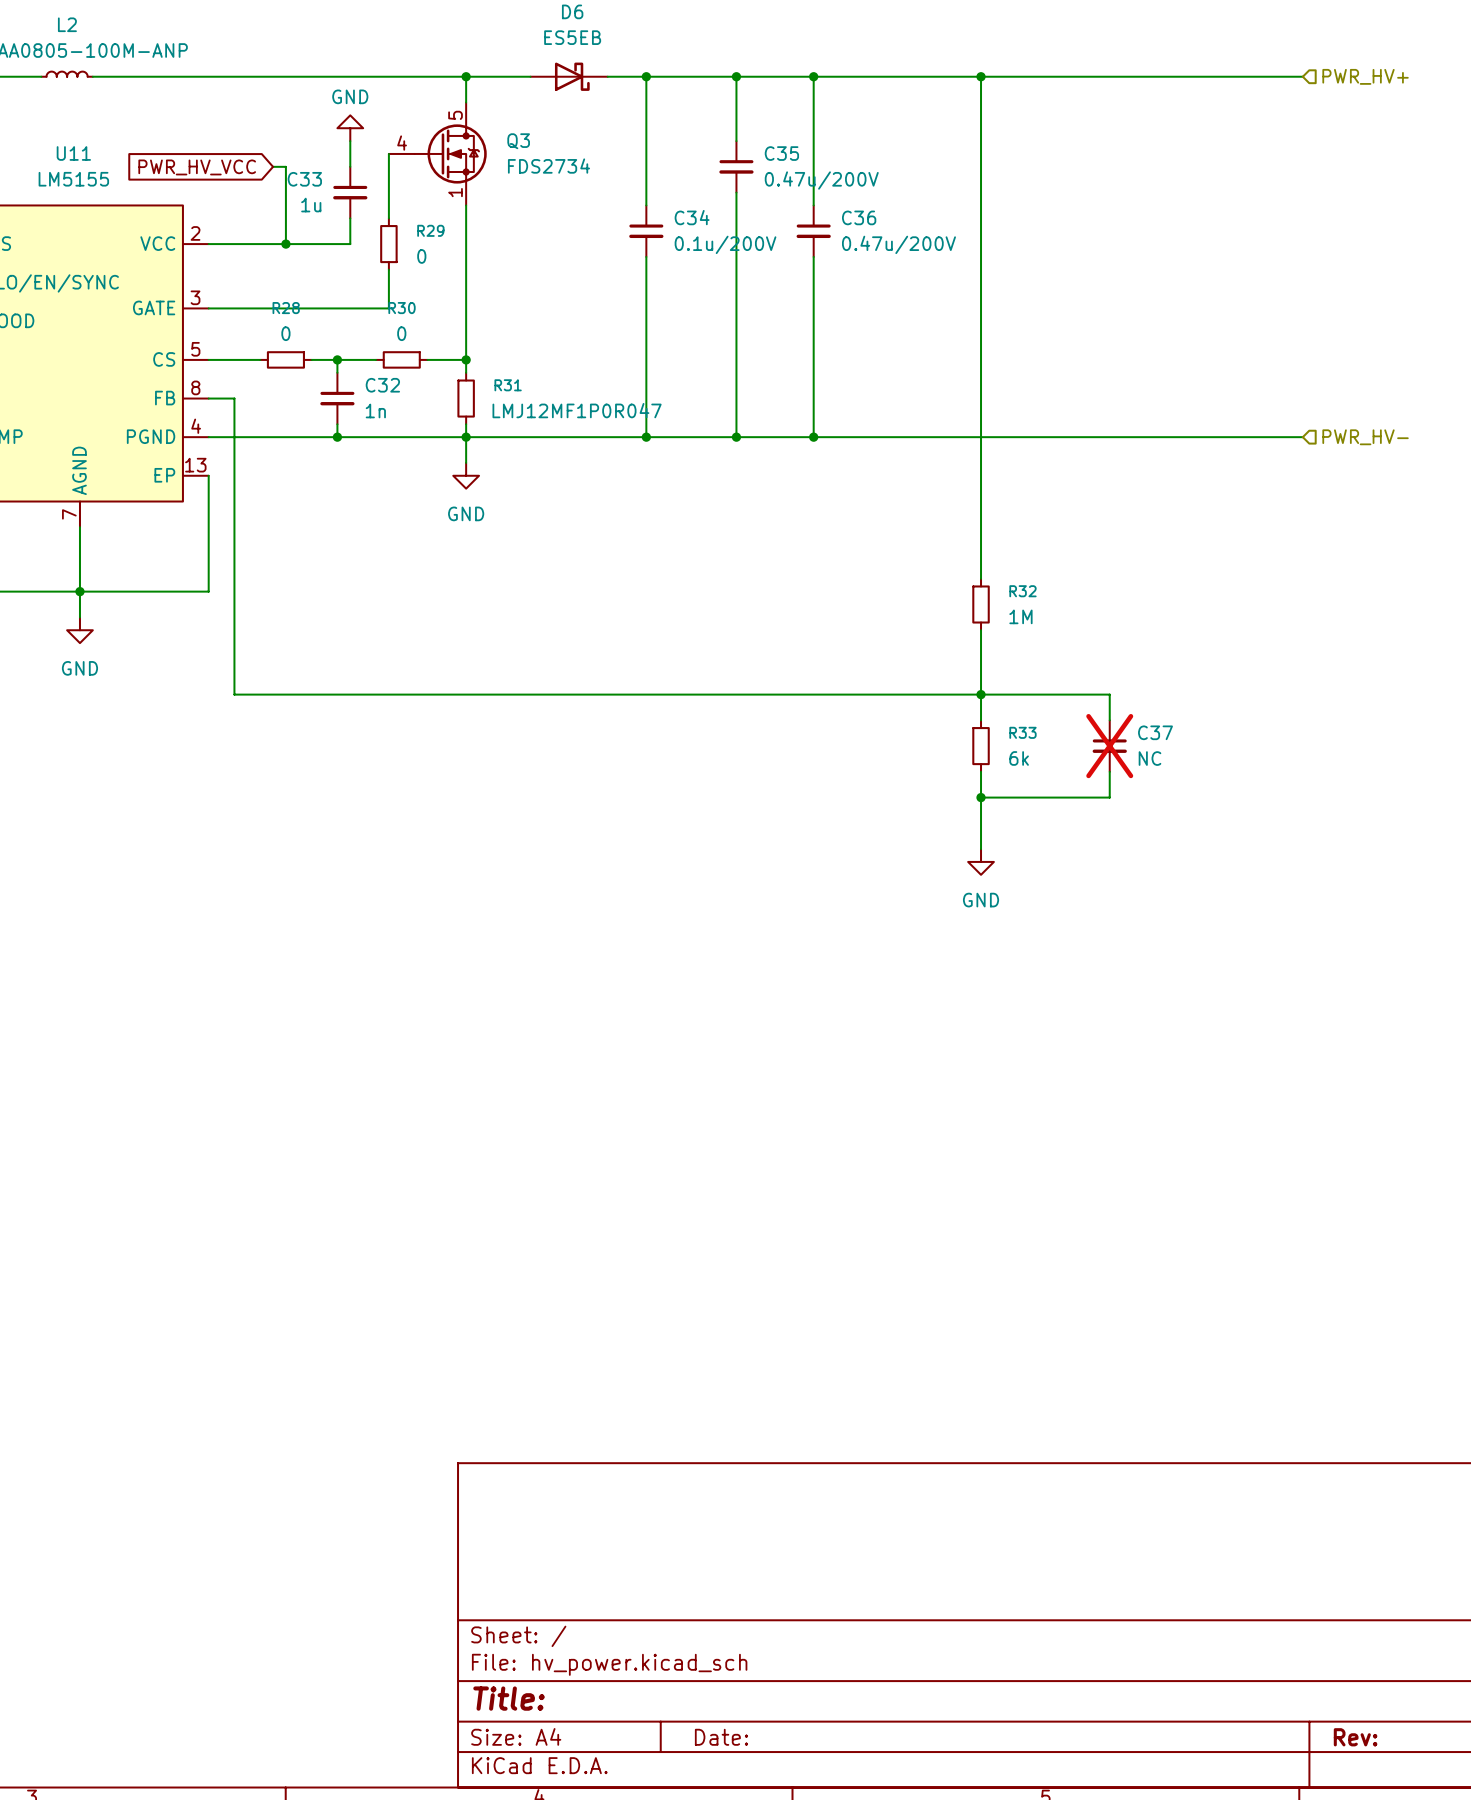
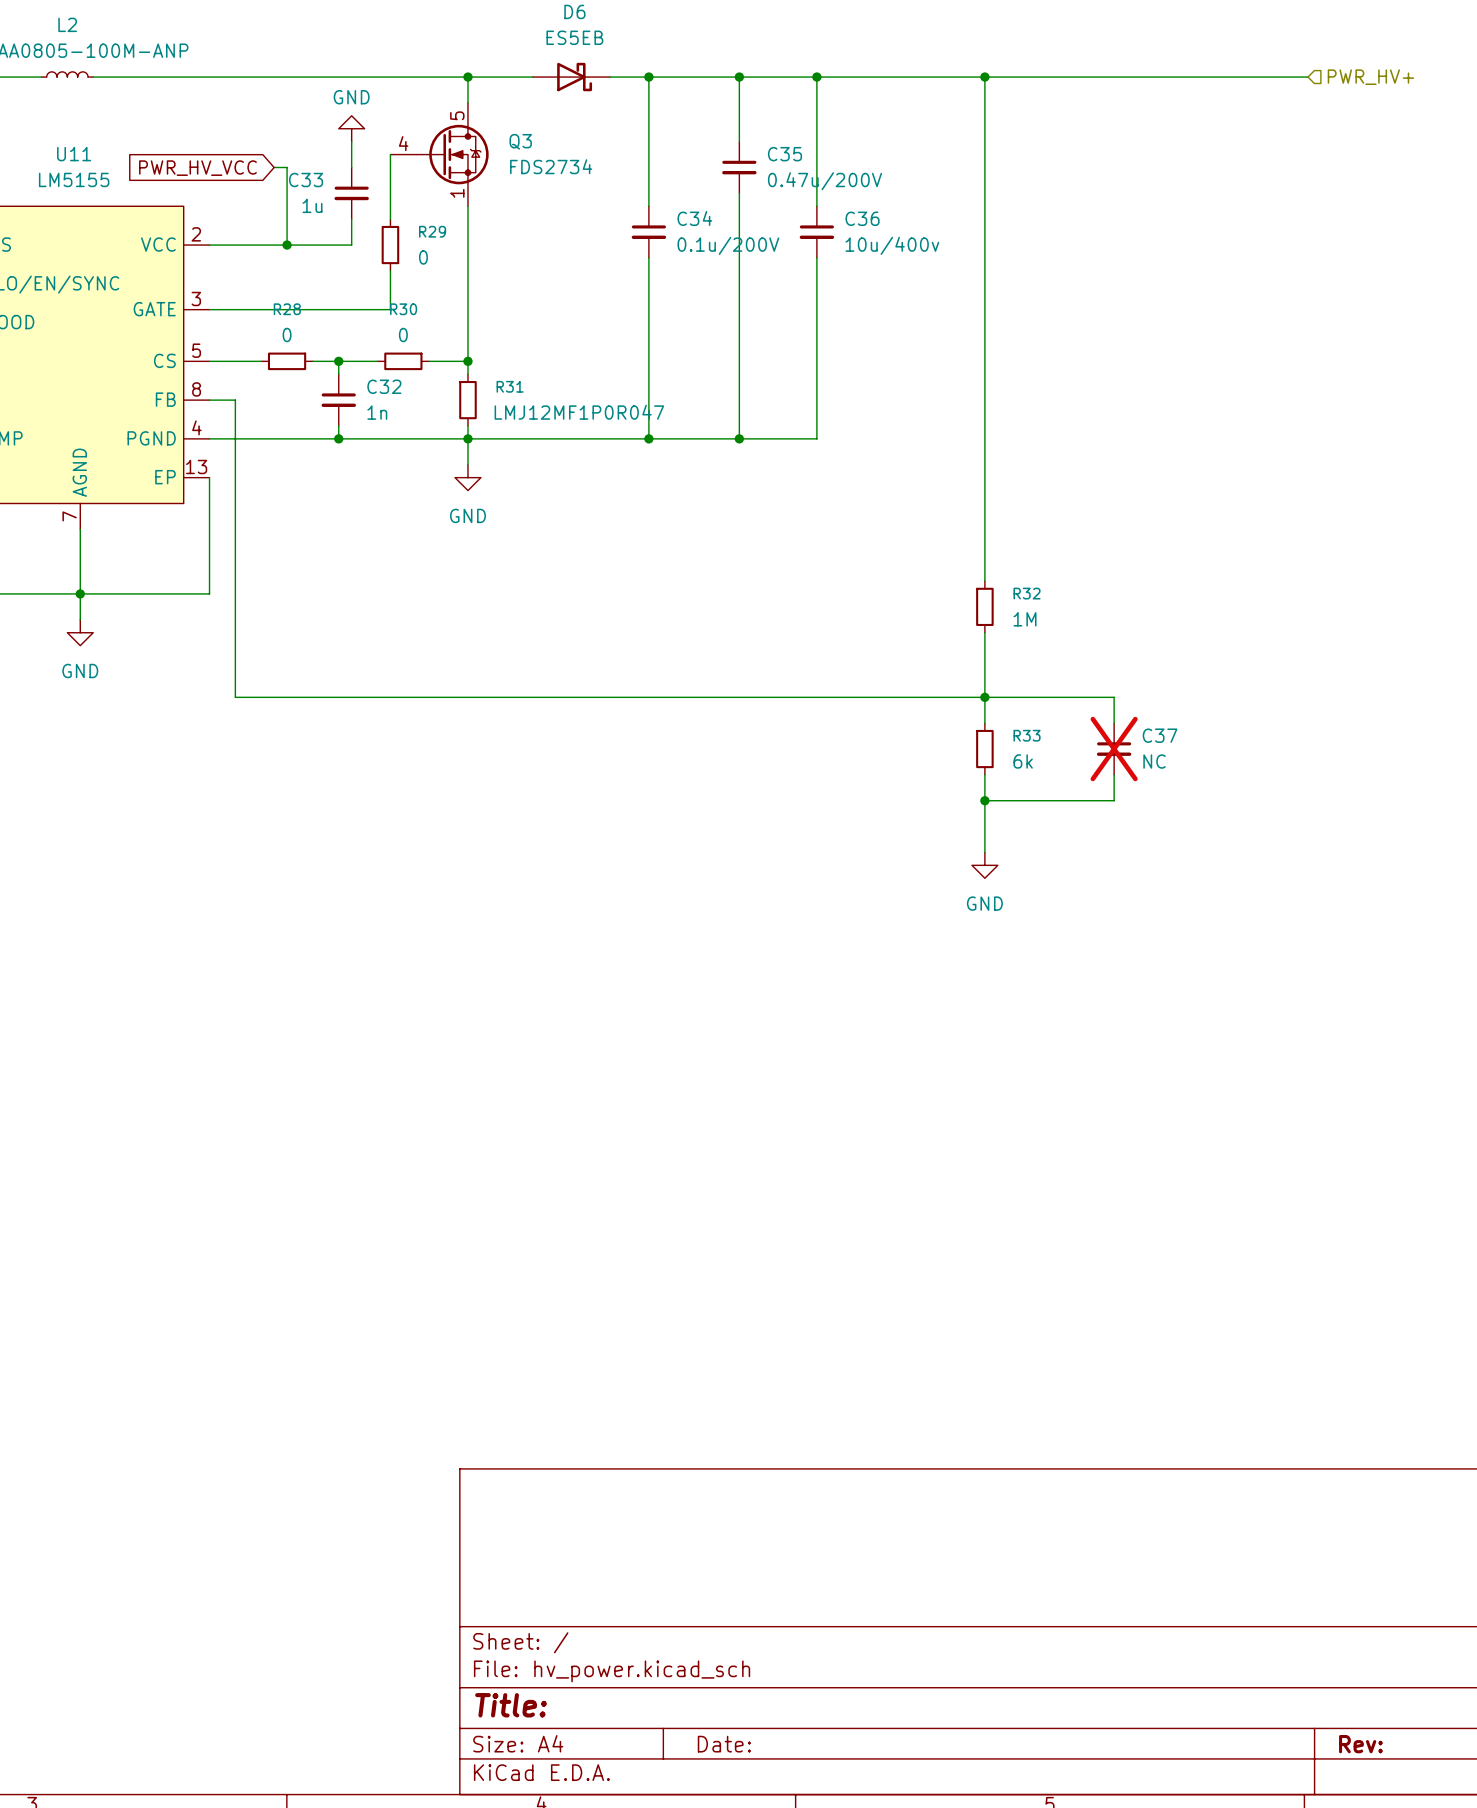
C36 value: 0.47u/200V (898, 244) -> 10u/400v (892, 245)
wire: (813, 437) (1302, 437) -> none
junction: (813, 437) -> none
hierarchical label: PWR_HV- (1365, 437) -> none

